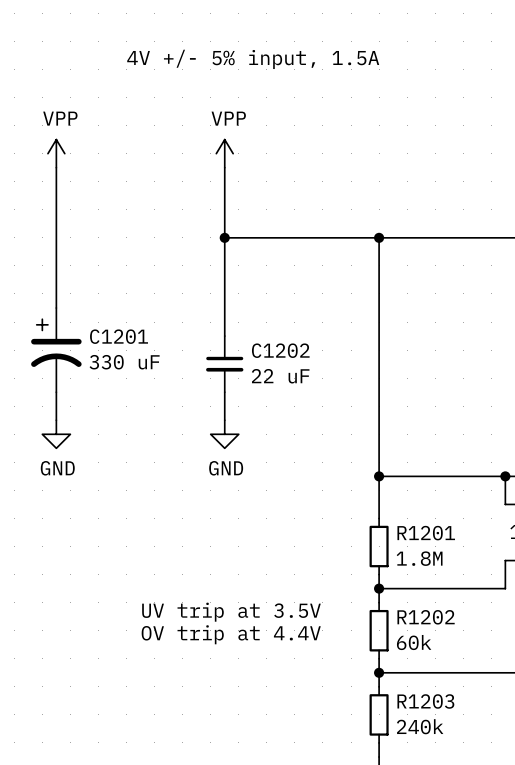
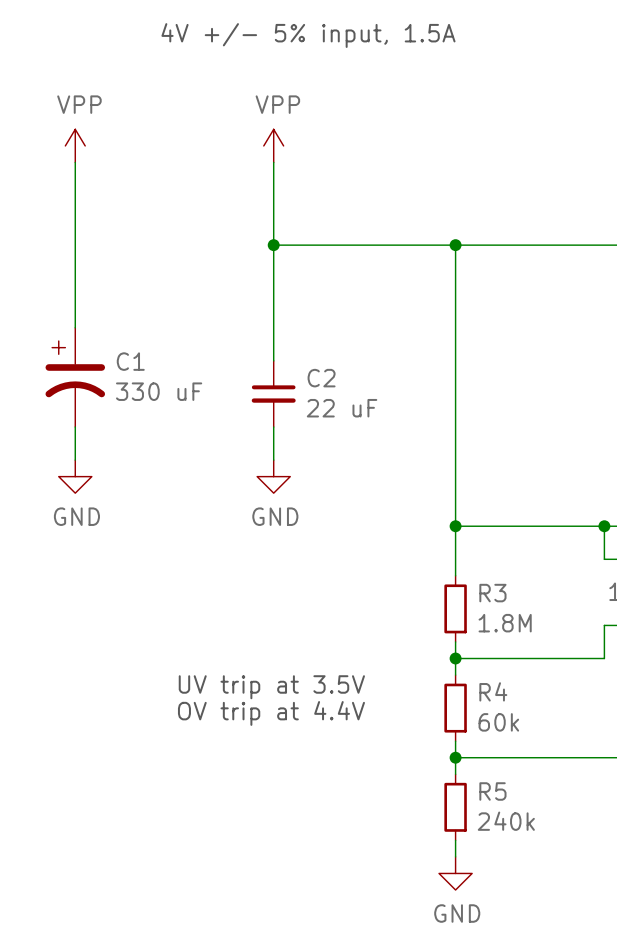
C1201 name: C1201 (119, 336) -> C1 (130, 361)
C1202 name: C1202 (280, 350) -> C2 (321, 378)
R1201 name: R1201 (426, 533) -> R3 (492, 593)
R1202 name: R1202 (426, 617) -> R4 (493, 691)
R1203 name: R1203 (425, 701) -> R5 (492, 791)

